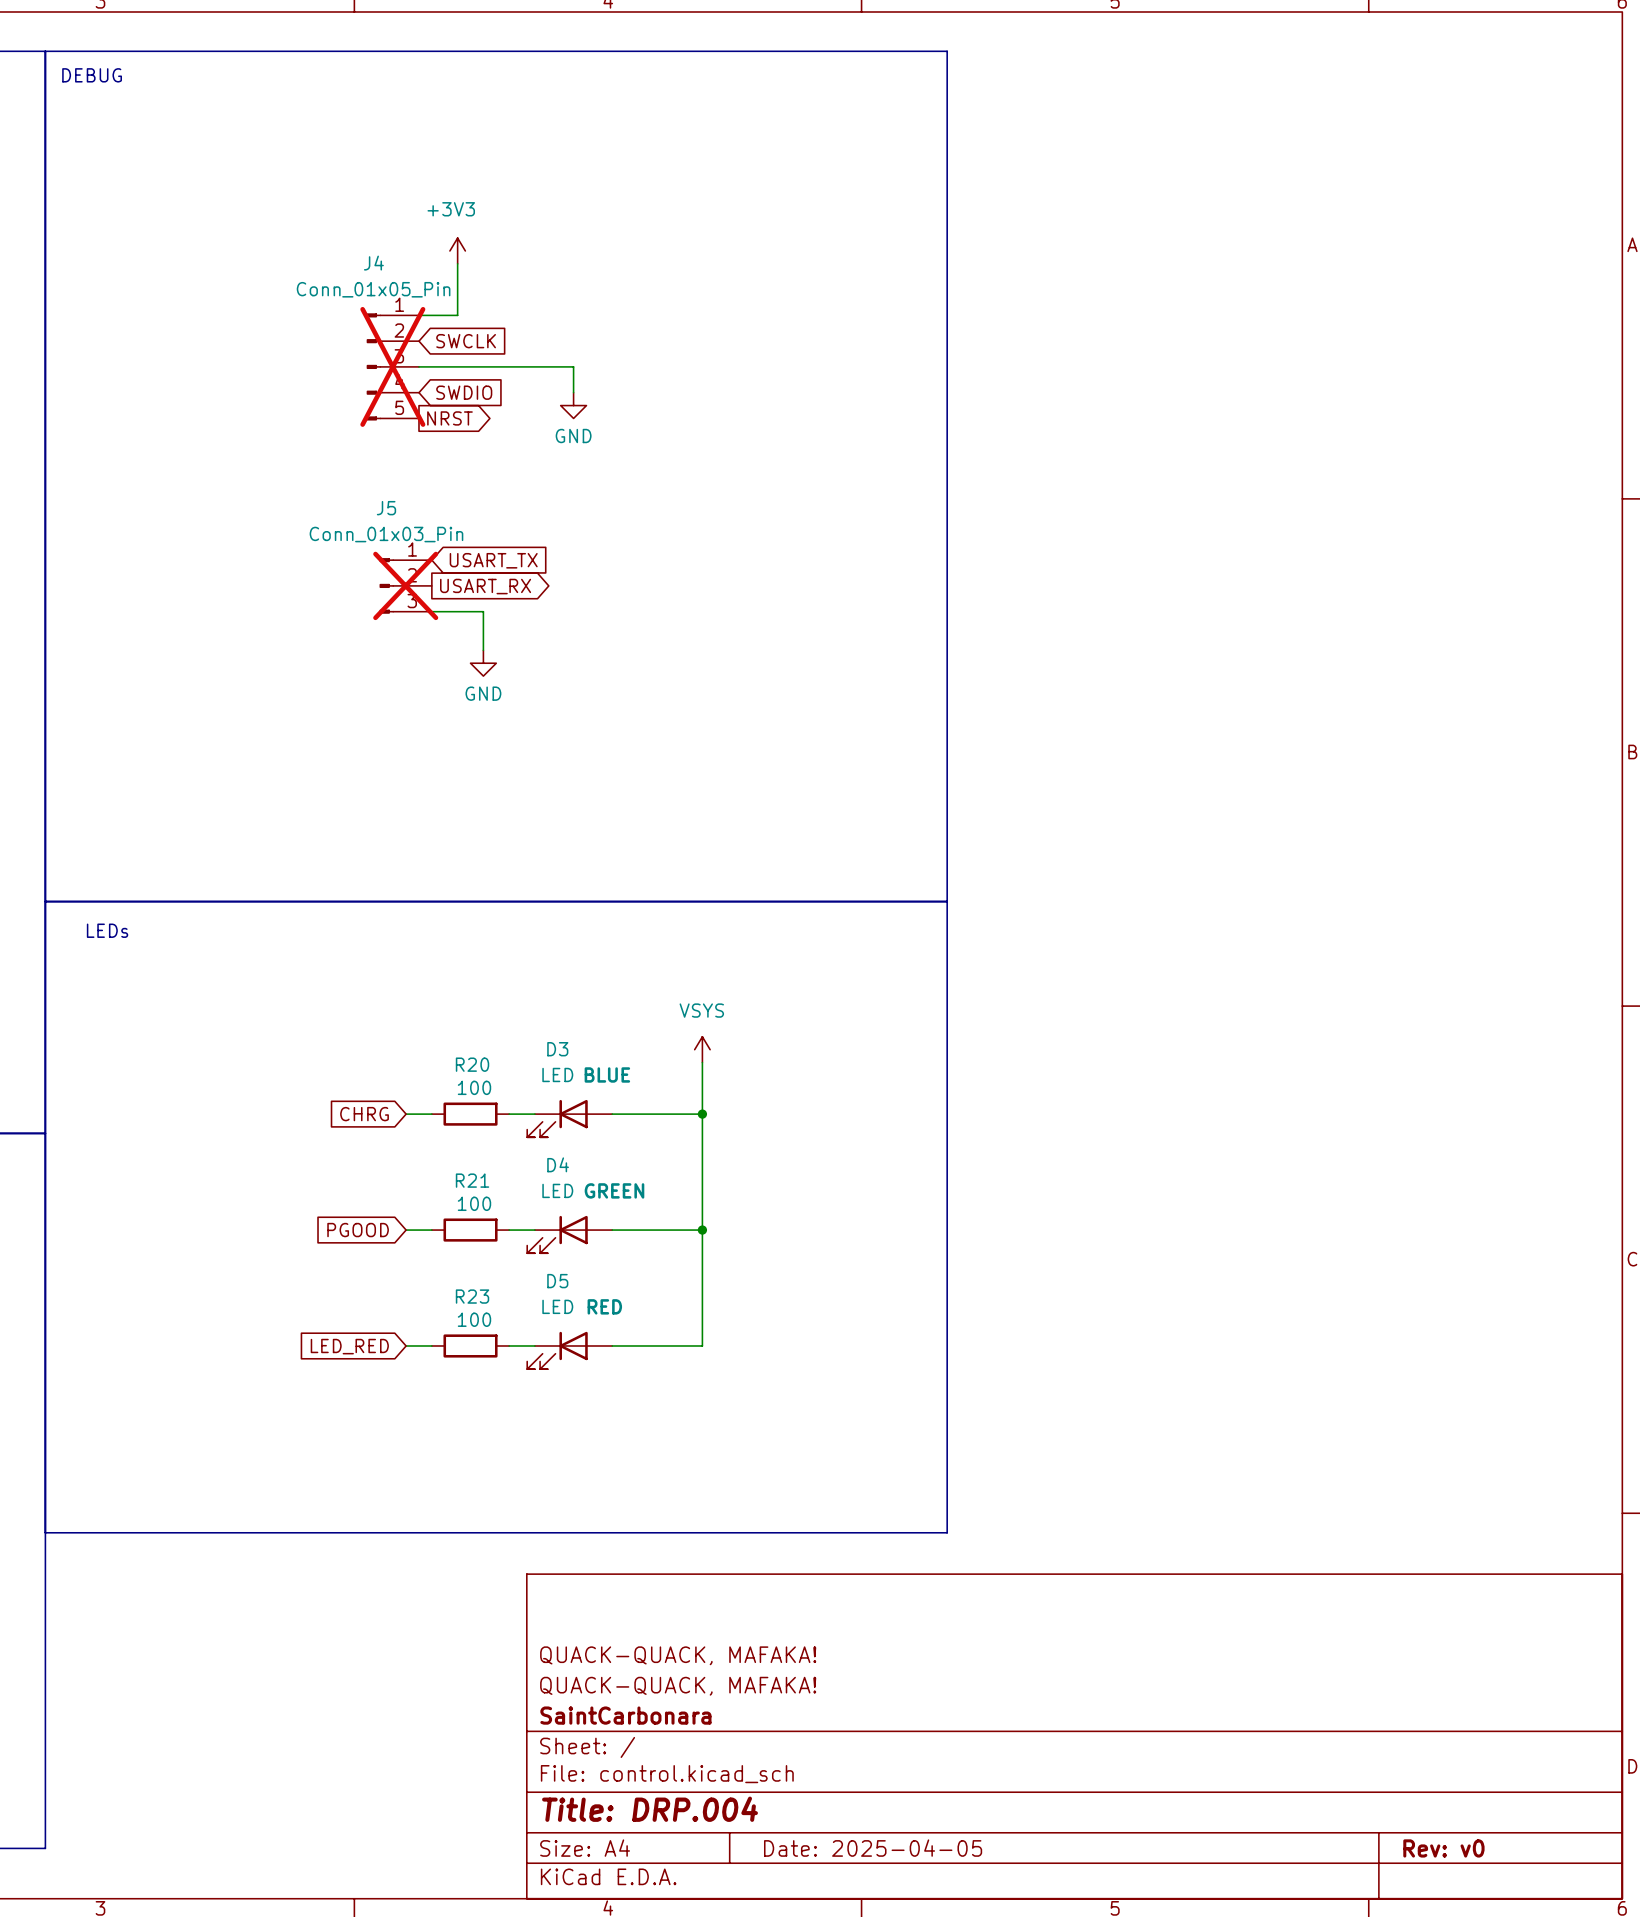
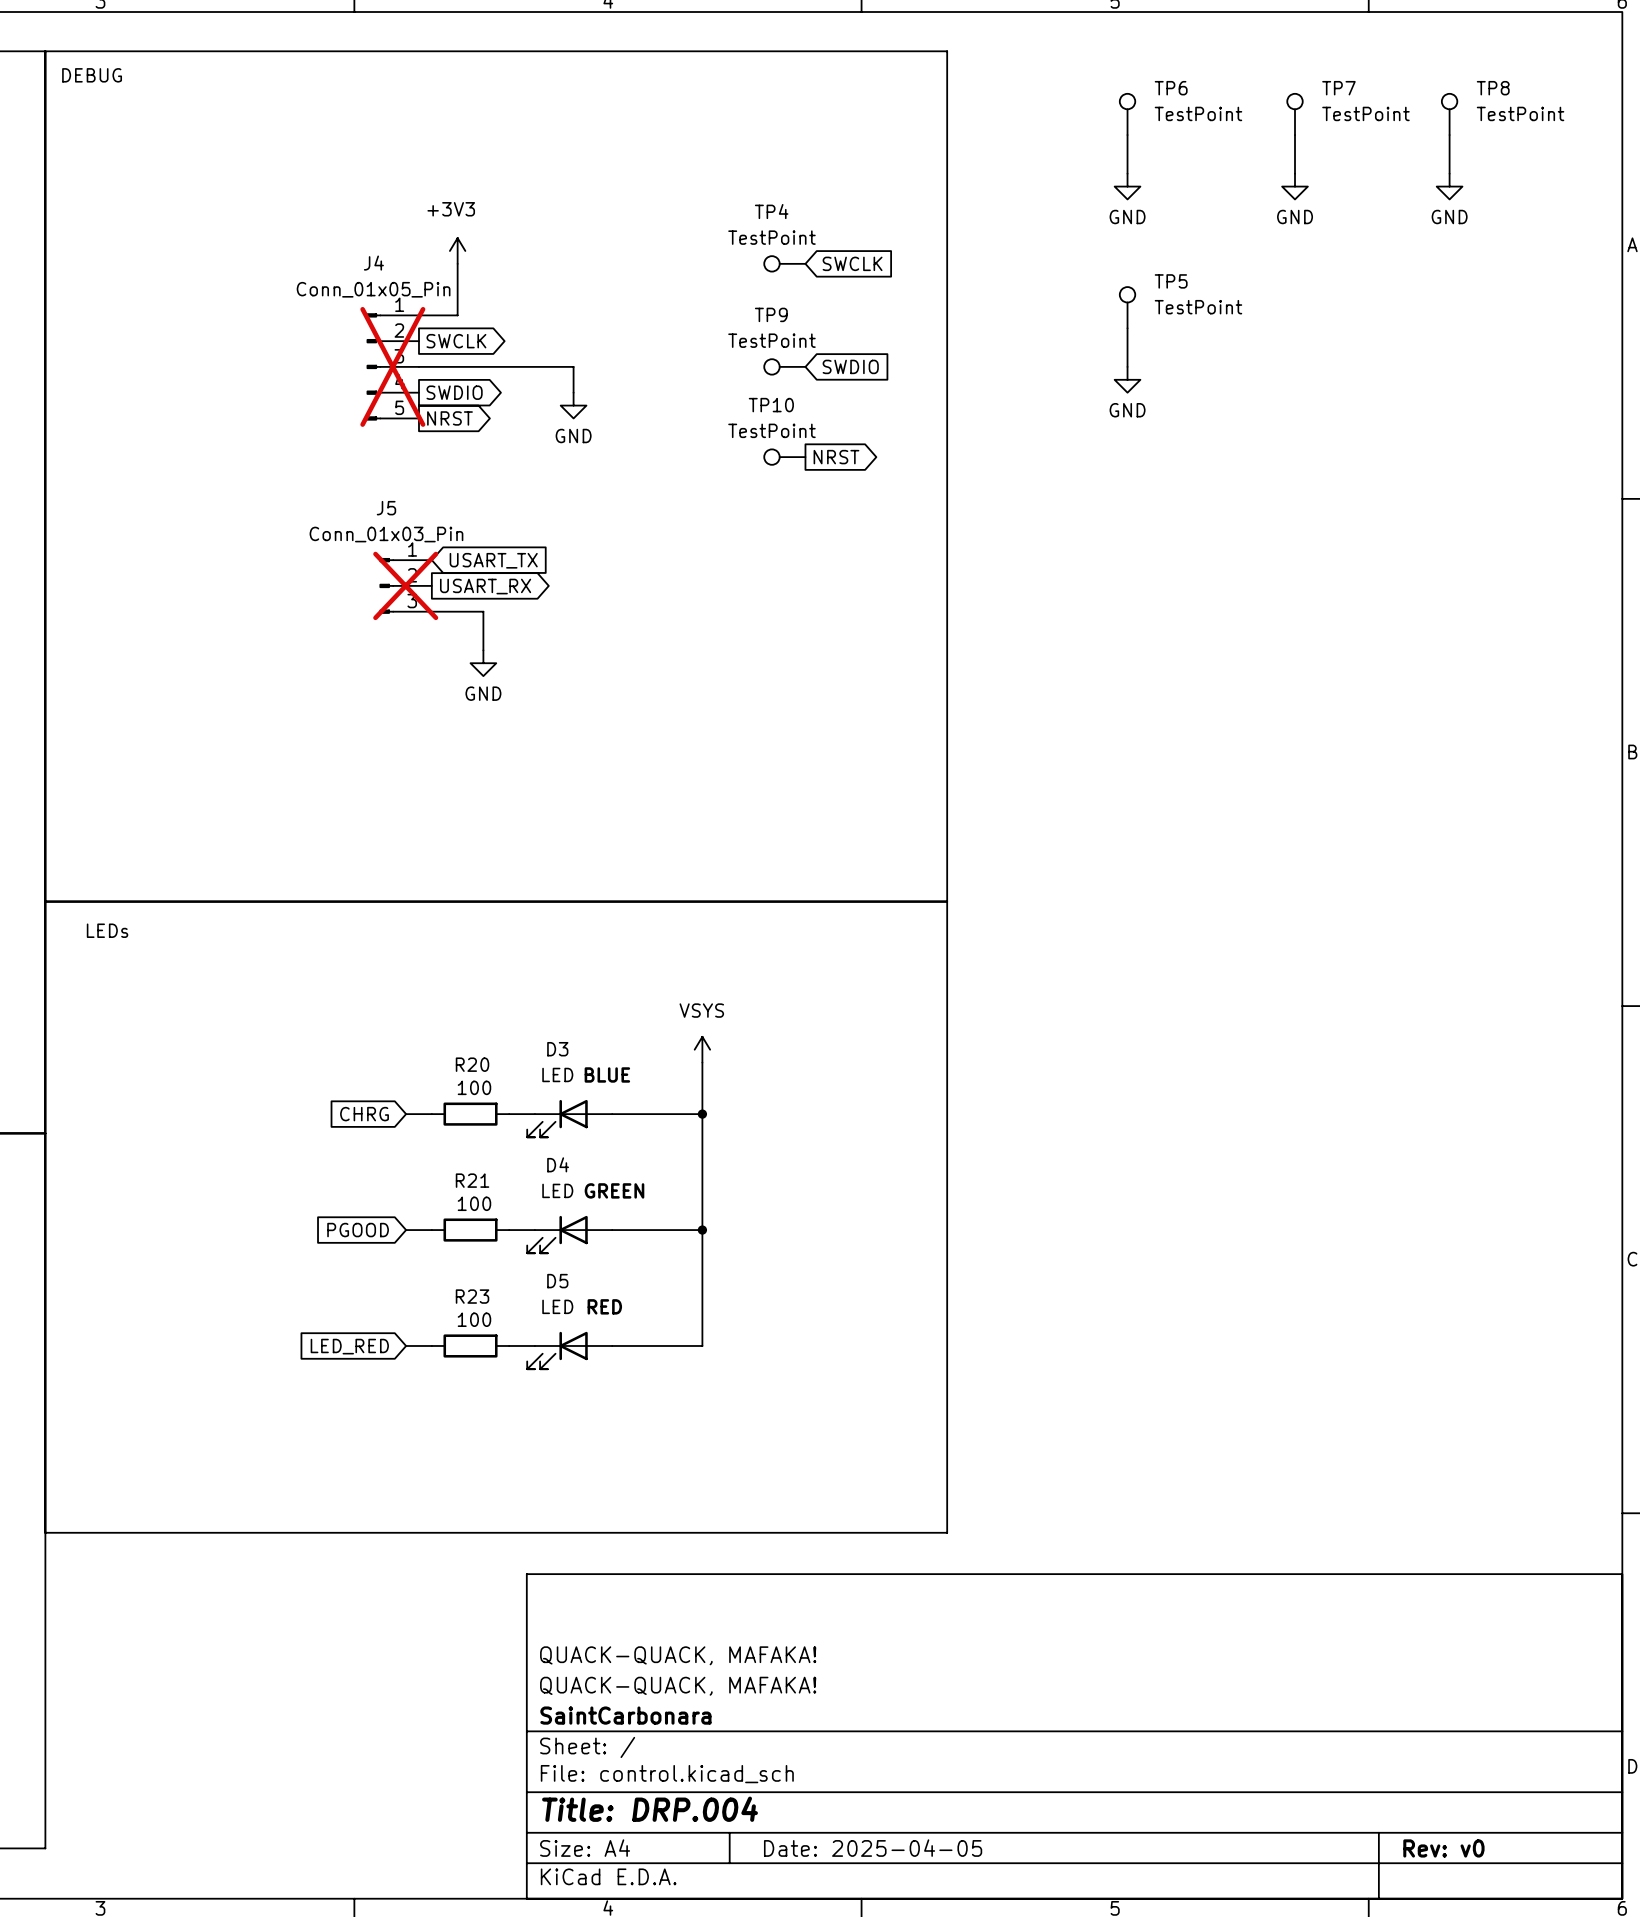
TP6: none -> TestPoint (1127, 114)
TP7: none -> TestPoint (1295, 114)
TP8: none -> TestPoint (1449, 114)
wire: none -> (1127, 135) (1127, 173)
wire: none -> (1295, 135) (1295, 173)
wire: none -> (1449, 135) (1449, 173)
power symbol: none -> GND (1127, 186)
power symbol: none -> GND (1295, 186)
power symbol: none -> GND (1449, 186)
TP4: none -> TestPoint (784, 263)
global label: none -> SWCLK (852, 263)
TP5: none -> TestPoint (1127, 307)
wire: none -> (1127, 328) (1127, 366)
global label shape: input (466, 341) -> output (456, 341)
TP9: none -> TestPoint (784, 366)
global label: none -> SWDIO (850, 366)
power symbol: none -> GND (1127, 379)
global label shape: input (464, 392) -> output (454, 392)
TP10: none -> TestPoint (784, 457)
global label: none -> NRST (836, 457)

